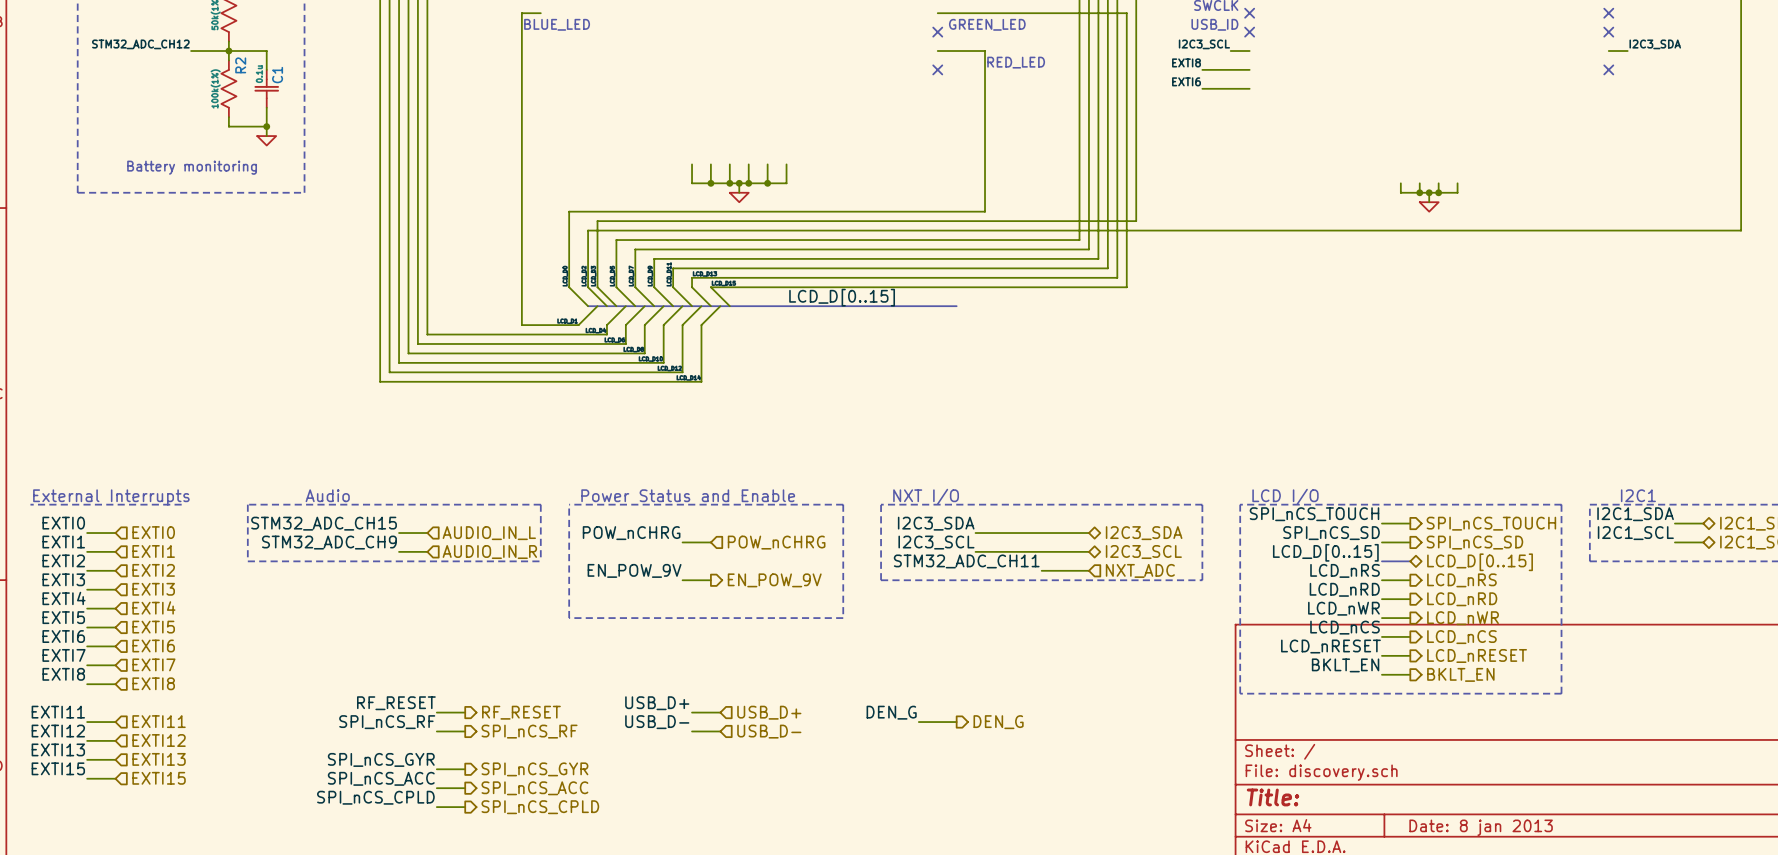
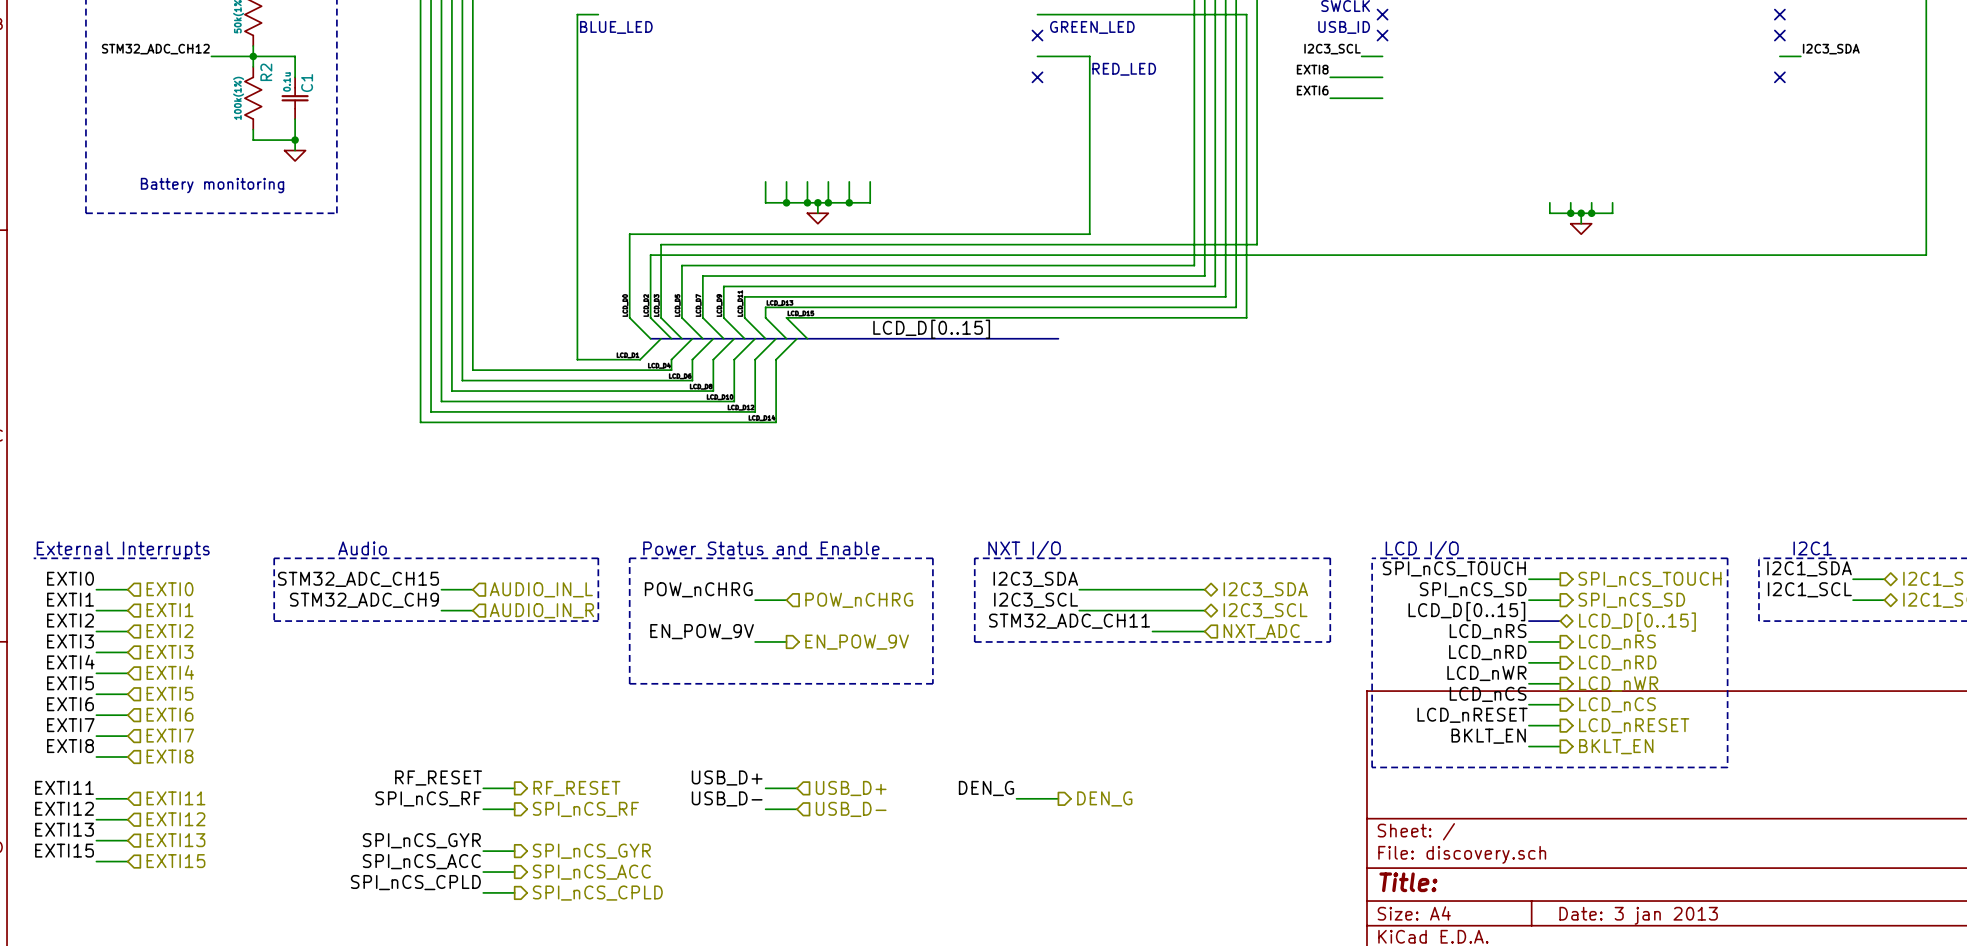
title block: Date: 8 jan 2013 (1481, 827) -> Date: 3 jan 2013 (1638, 915)

